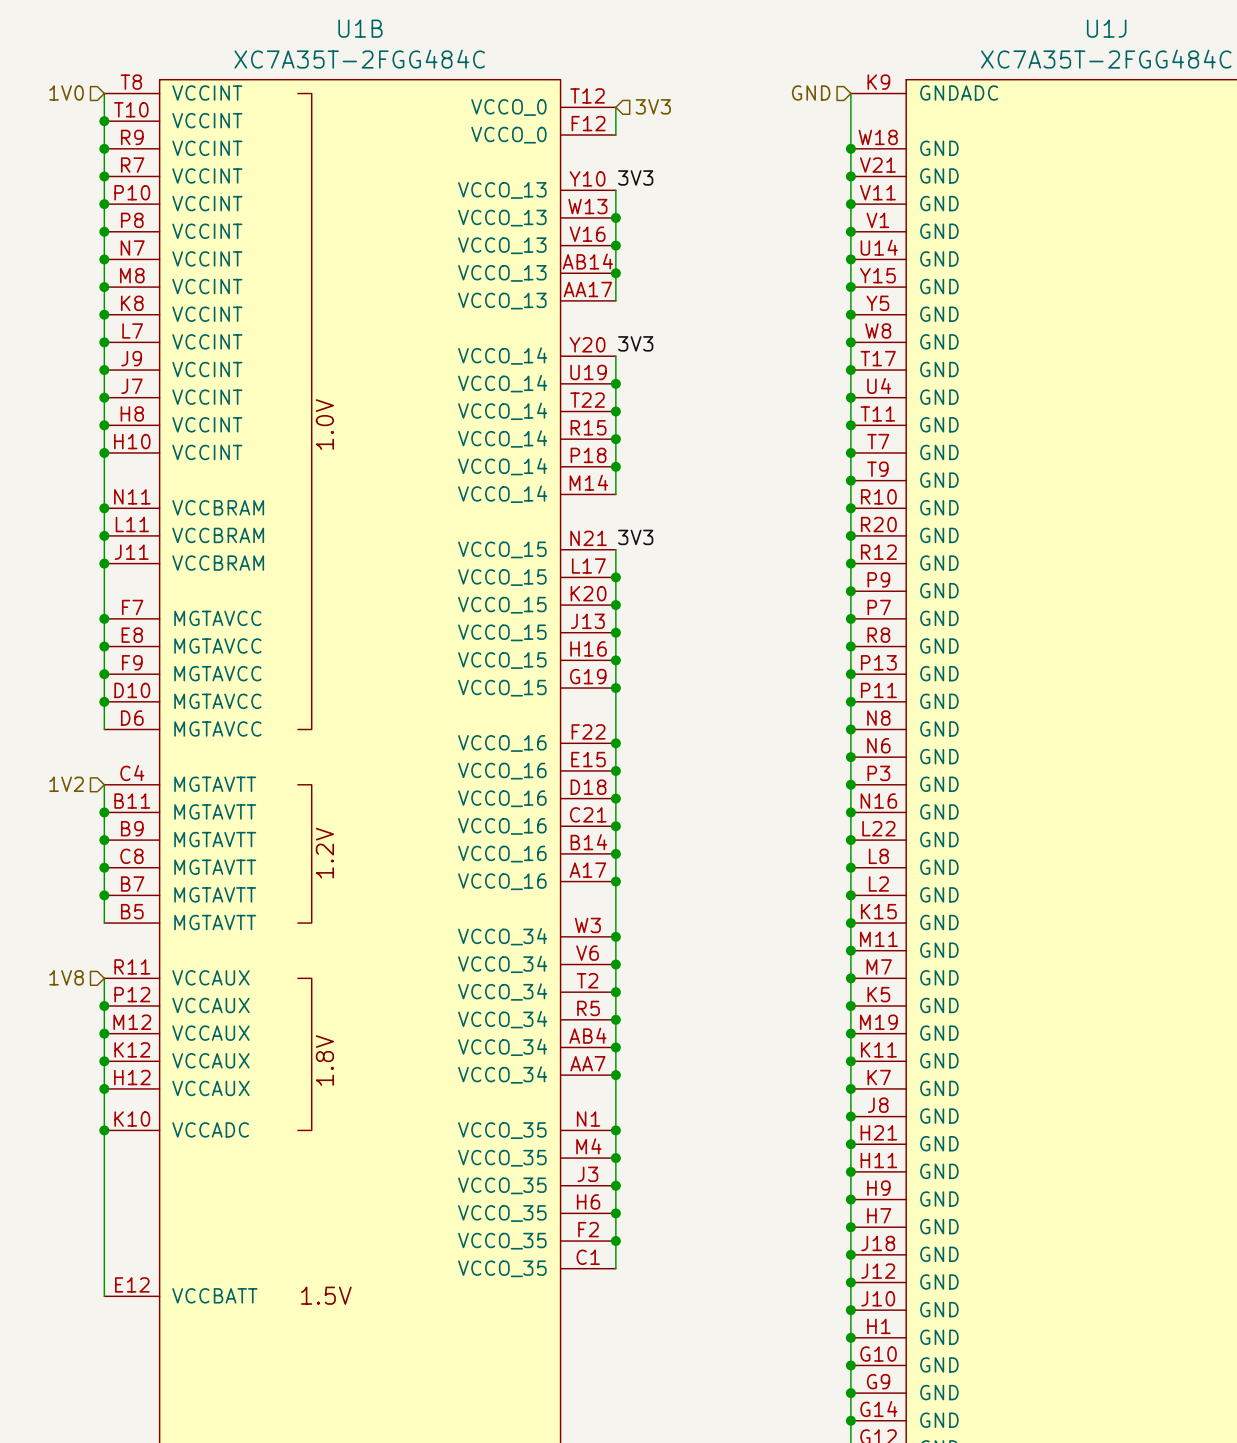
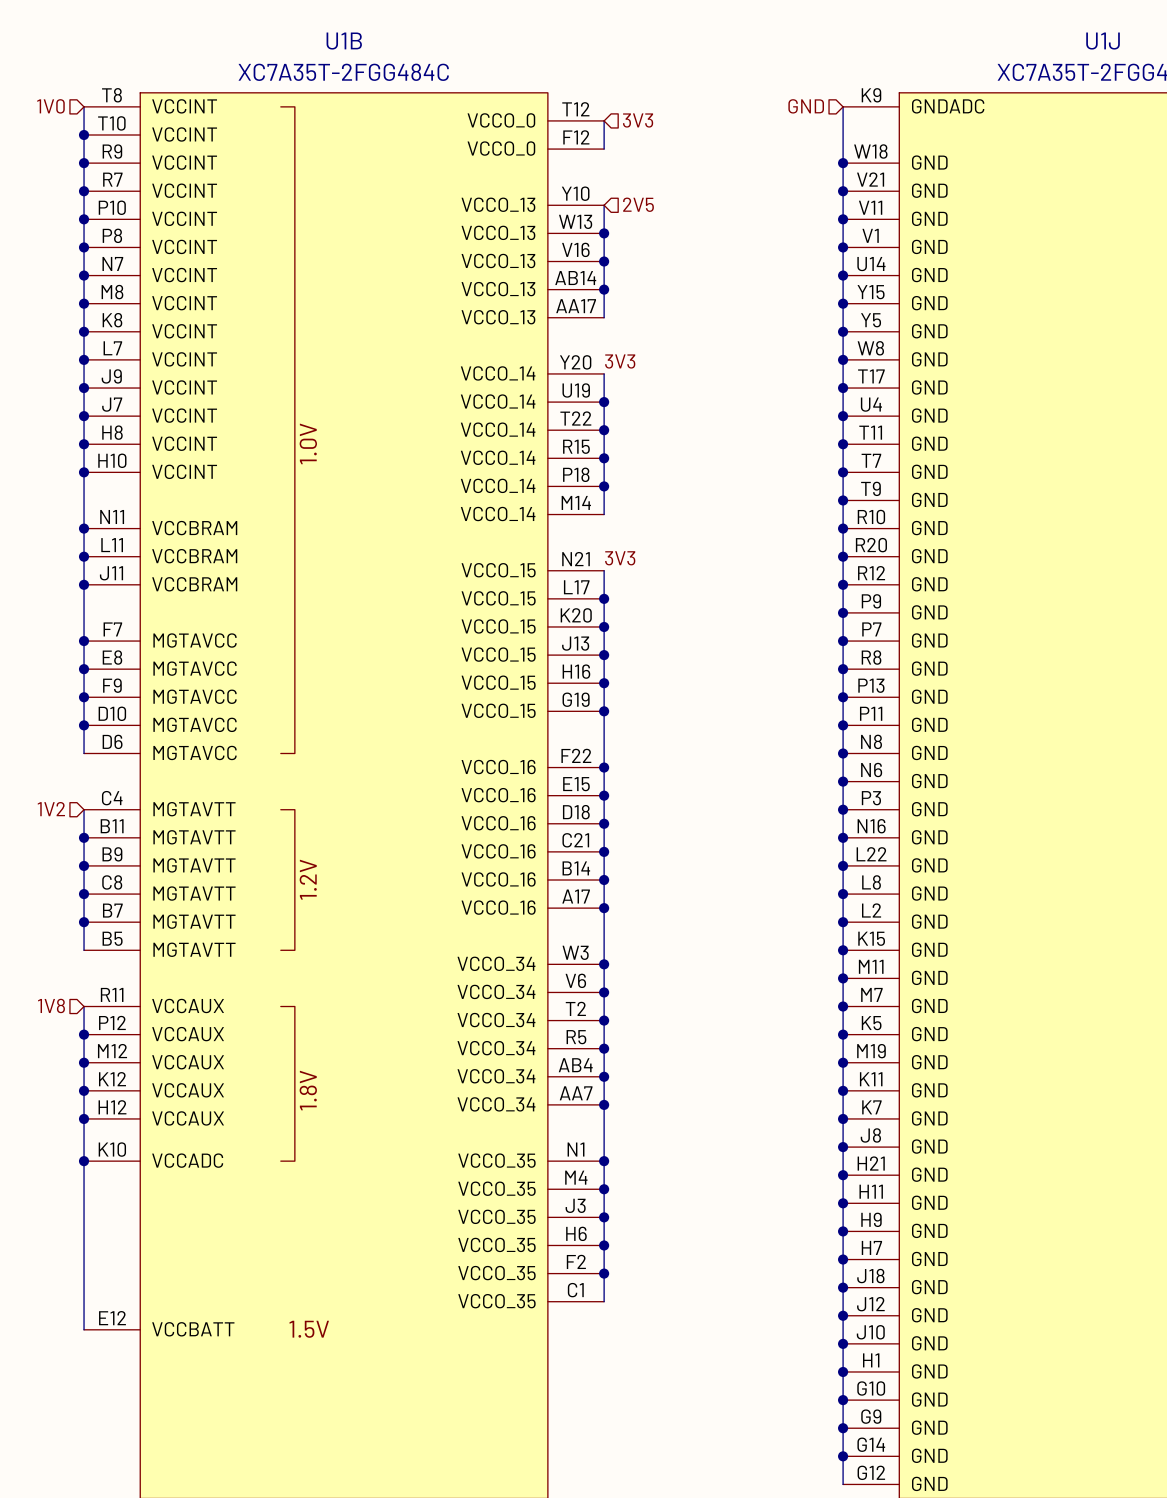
label: 3V3 (635, 177) -> none
hierarchical label: none -> 2V5 (638, 204)

